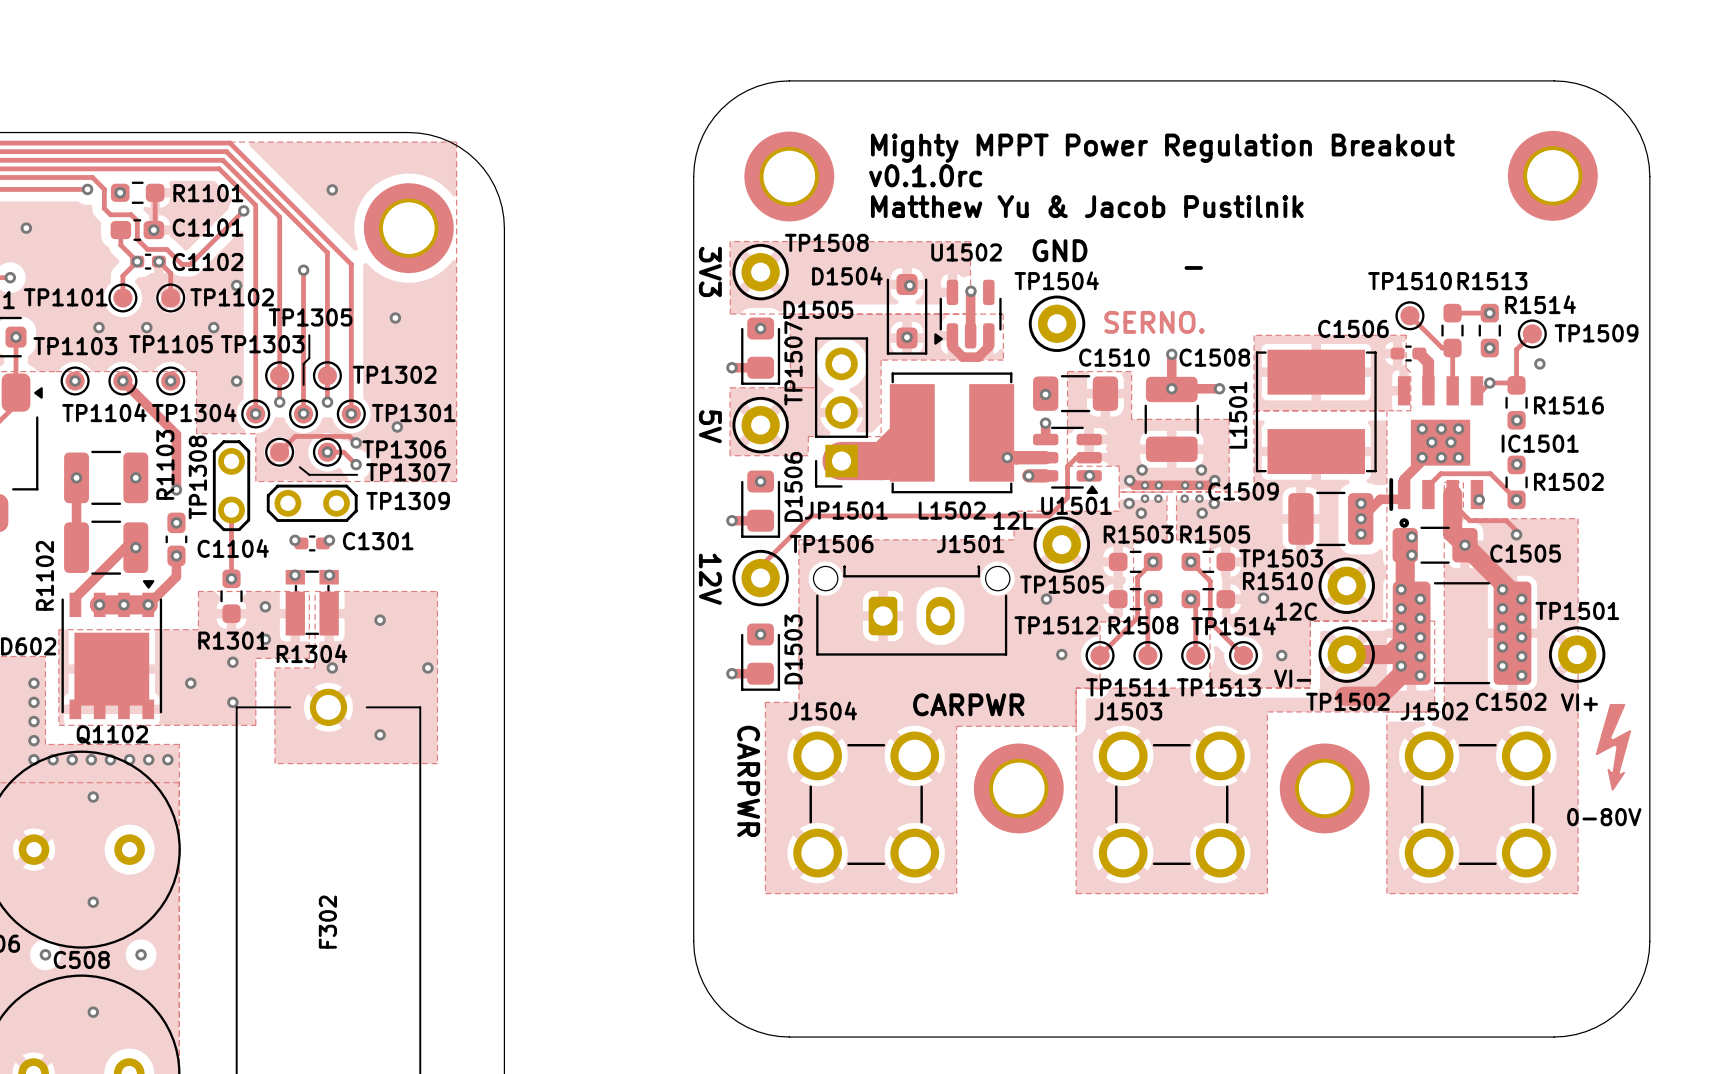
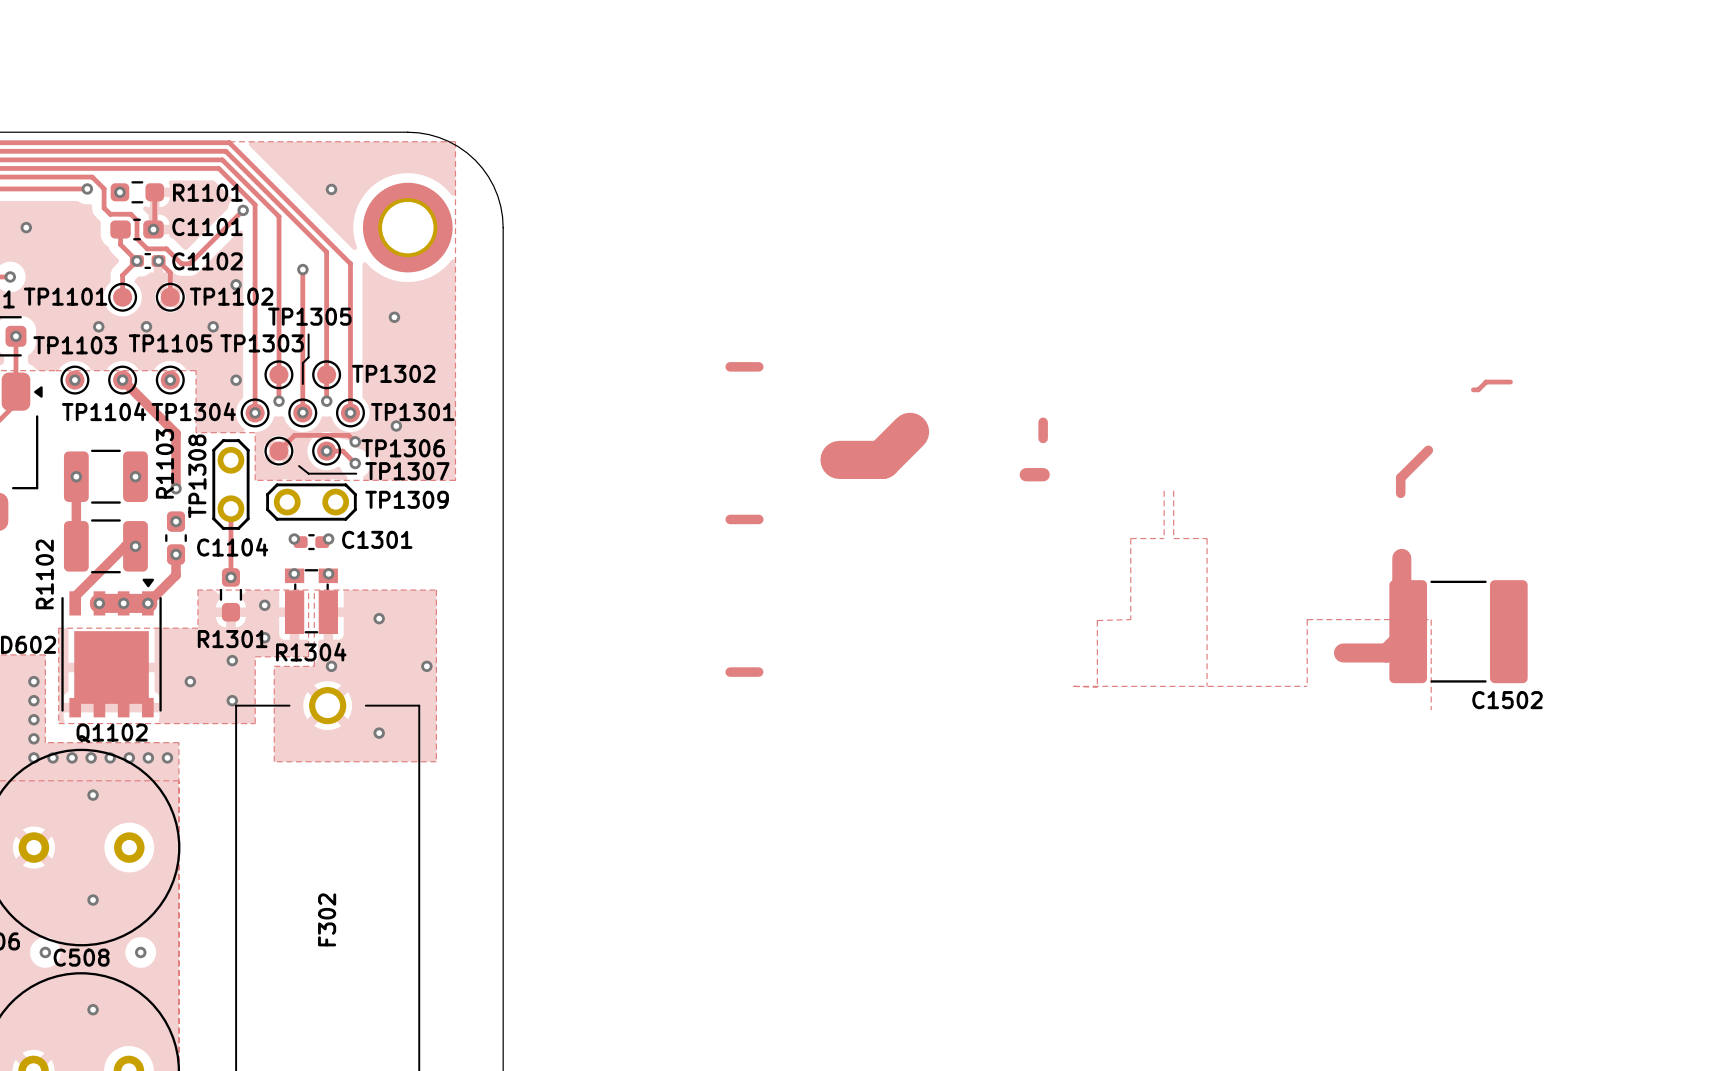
board edge: (789, 80) (1554, 80) (1575, 83) (1595, 90) (1613, 101) (1628, 116) (1644, 144) (1649, 176) (1649, 941) (1647, 962) (1640, 982) (1628, 1001) (1613, 1016) (1585, 1031) (1554, 1037) (789, 1037) (768, 1034) (747, 1027) (729, 1016) (714, 1001) (699, 972) (693, 941) (694, 165) (703, 135) (721, 108) (747, 90) (768, 83) (789, 80) -> none
text: Mighty MPPT Power Regulation Breakout (1162, 148) -> none
text: v0.1.0rc (925, 175) -> none
part: (1552, 175) -> none
part: (789, 176) -> none
text: Matthew Yu & Jacob Pustilnik (1087, 206) -> none
text: GND (1060, 250) -> none
text: - (1193, 267) -> none
text: 3V3 (710, 271) -> none
TP1508: (760, 272) -> none
via: (909, 285) -> none
track: (970, 291) (970, 335) -> none
via: (970, 291) -> none
track: (1452, 313) (1489, 313) -> none
via: (1489, 313) -> none
zone outline: (799, 314) (730, 314) (730, 241) (970, 241) (970, 314) -> none
D1504: (907, 314) -> none
U1502: (967, 314) -> none
zone outline: (970, 314) (1003, 314) (1003, 360) (881, 360) (881, 436) (808, 436) (808, 455) (730, 455) (730, 387) (816, 387) (790, 387) (790, 314) (970, 314) -> none
track: (1409, 315) (1442, 348) (1452, 348) -> none
TP1510: (1409, 315) -> none
text: SERNO. (1154, 322) -> none
TP1504: (1057, 323) -> none
via: (760, 328) -> none
R1513: (1452, 330) -> none
R1514: (1489, 330) -> none
track: (1532, 333) (1516, 349) (1516, 385) -> none
TP1509: (1532, 333) -> none
track: (952, 335) (952, 346) (962, 357) (978, 357) (988, 346) (988, 335) -> none
via: (907, 337) -> none
track: (1452, 348) (1452, 390) -> none
via: (1489, 348) -> none
D1505: (760, 351) -> none
C1506: (1408, 353) -> none
track: (1419, 353) (1428, 362) (1428, 390) -> none
track: (1171, 354) (1171, 388) (1219, 388) -> none
via: (1171, 354) -> none
via: (1539, 363) -> none
via: (731, 367) -> none
via: (1489, 382) -> none
via: (1171, 388) -> none
via: (1219, 388) -> none
C1510: (1075, 393) -> none
via: (1045, 394) -> none
R1516: (1516, 402) -> none
zone outline: (1253, 410) (1410, 410) (1410, 372) (1406, 367) (1406, 335) (1254, 335) (1253, 410) -> none
zone outline: (1253, 410) (1253, 492) (1119, 492) -> none
zone outline: (1386, 410) (1386, 621) -> none
L1501: (1316, 411) -> none
JP1501: (841, 412) -> none
C1508: (1171, 419) -> none
via: (1516, 420) -> none
via: (1045, 423) -> none
TP1507: (760, 425) -> none
text: 5V (710, 426) -> none
via: (1422, 428) -> none
via: (1441, 428) -> none
via: (1458, 428) -> none
L1502: (951, 432) -> none
via: (1431, 442) -> none
via: (1450, 442) -> none
IC1501: (1436, 452) -> none
via: (1007, 457) -> none
track: (1089, 457) (1076, 457) (1067, 466) (1067, 497) (1049, 515) (811, 515) (760, 566) -> none
via: (1422, 457) -> none
via: (1441, 457) -> none
via: (1458, 457) -> none
U1501: (1067, 460) -> none
via: (1516, 464) -> none
via: (1142, 470) -> none
via: (1201, 470) -> none
via: (1028, 475) -> none
via: (1089, 475) -> none
track: (1129, 480) (1134, 485) (1210, 485) (1214, 480) -> none
via: (1129, 480) -> none
via: (1214, 480) -> none
via: (760, 481) -> none
R1502: (1516, 482) -> none
via: (1144, 485) -> none
via: (1158, 485) -> none
via: (1185, 485) -> none
via: (1199, 485) -> none
track: (1428, 486) (1440, 473) (1490, 473) (1516, 499) -> none
zone outline: (1229, 492) (1229, 419) (1131, 419) (1131, 371) (1067, 371) (1067, 466) (1119, 466) (1119, 511) (1014, 511) (1014, 539) (798, 539) (798, 702) (765, 702) (765, 893) (956, 893) (956, 726) (1076, 726) -> none
via: (1144, 498) -> none
via: (1158, 498) -> none
via: (1184, 498) -> none
via: (1199, 498) -> none
track: (1403, 499) (1380, 499) (1361, 518) -> none
via: (1479, 499) -> none
via: (1516, 499) -> none
via: (1129, 503) -> none
via: (1214, 503) -> none
via: (1361, 503) -> none
D1506: (760, 504) -> none
via: (1141, 513) -> none
via: (1202, 513) -> none
C1509: (1330, 518) -> none
via: (1361, 518) -> none
via: (731, 520) -> none
text: 12L (1013, 520) -> none
via: (1361, 534) -> none
track: (1516, 534) (1516, 530) (1506, 520) (1469, 520) (1452, 503) (1452, 494) (1452, 532) (1512, 592) -> none
via: (1516, 534) -> none
via: (1411, 536) -> none
TP1505: (1061, 544) -> none
C1505: (1435, 545) -> none
via: (1464, 545) -> none
via: (1411, 555) -> none
R1503: (1135, 561) -> none
track: (1153, 561) (1137, 577) (1137, 618) (1100, 655) -> none
via: (1153, 561) -> none
track: (1190, 561) (1210, 581) (1210, 622) (1243, 655) -> none
via: (1190, 561) -> none
R1505: (1208, 561) -> none
TP1506: (760, 578) -> none
text: 12V (710, 579) -> none
TP1503: (1346, 585) -> none
via: (1401, 589) -> none
via: (1502, 589) -> none
via: (1263, 598) -> none
via: (1046, 599) -> none
R1508: (1135, 599) -> none
via: (1153, 599) -> none
via: (1190, 599) -> none
R1510: (1208, 599) -> none
via: (1420, 599) -> none
via: (1521, 599) -> none
track: (1153, 603) (1147, 608) (1147, 655) -> none
track: (1195, 603) (1195, 655) -> none
via: (1401, 608) -> none
via: (1502, 608) -> none
J1501: (911, 610) -> none
text: 12C (1296, 611) -> none
via: (1420, 618) -> none
via: (1521, 618) -> none
via: (1401, 627) -> none
via: (1502, 627) -> none
via: (760, 634) -> none
via: (1420, 637) -> none
via: (1521, 637) -> none
via: (1401, 646) -> none
via: (1502, 646) -> none
via: (1061, 654) -> none
TP1502: (1346, 654) -> none
TP1501: (1577, 654) -> none
TP1512: (1100, 655) -> none
TP1511: (1147, 655) -> none
TP1513: (1195, 655) -> none
TP1514: (1243, 655) -> none
via: (1281, 655) -> none
via: (1420, 656) -> none
via: (1521, 656) -> none
D1503: (760, 657) -> none
track: (1411, 664) (1379, 696) (1344, 696) -> none
via: (1401, 666) -> none
via: (1502, 666) -> none
via: (731, 673) -> none
via: (1420, 675) -> none
via: (1521, 675) -> none
text: VI- (1292, 678) -> none
zone outline: (1076, 688) (1076, 893) (1267, 893) (1267, 711) (1444, 711) (1444, 482) (1463, 482) (1463, 518) (1578, 518) (1578, 893) (1386, 893) (1386, 711) -> none
text: VI+ (1579, 702) -> none
drawing: [1595, 703, 1632, 791] -> none
text: CARPWR (968, 704) -> none
text: CARPWR (748, 781) -> none
part: (1018, 788) -> none
part: (1324, 788) -> none
J1504: (866, 804) -> none
J1503: (1171, 804) -> none
J1502: (1477, 804) -> none
text: 0-80V (1604, 817) -> none

